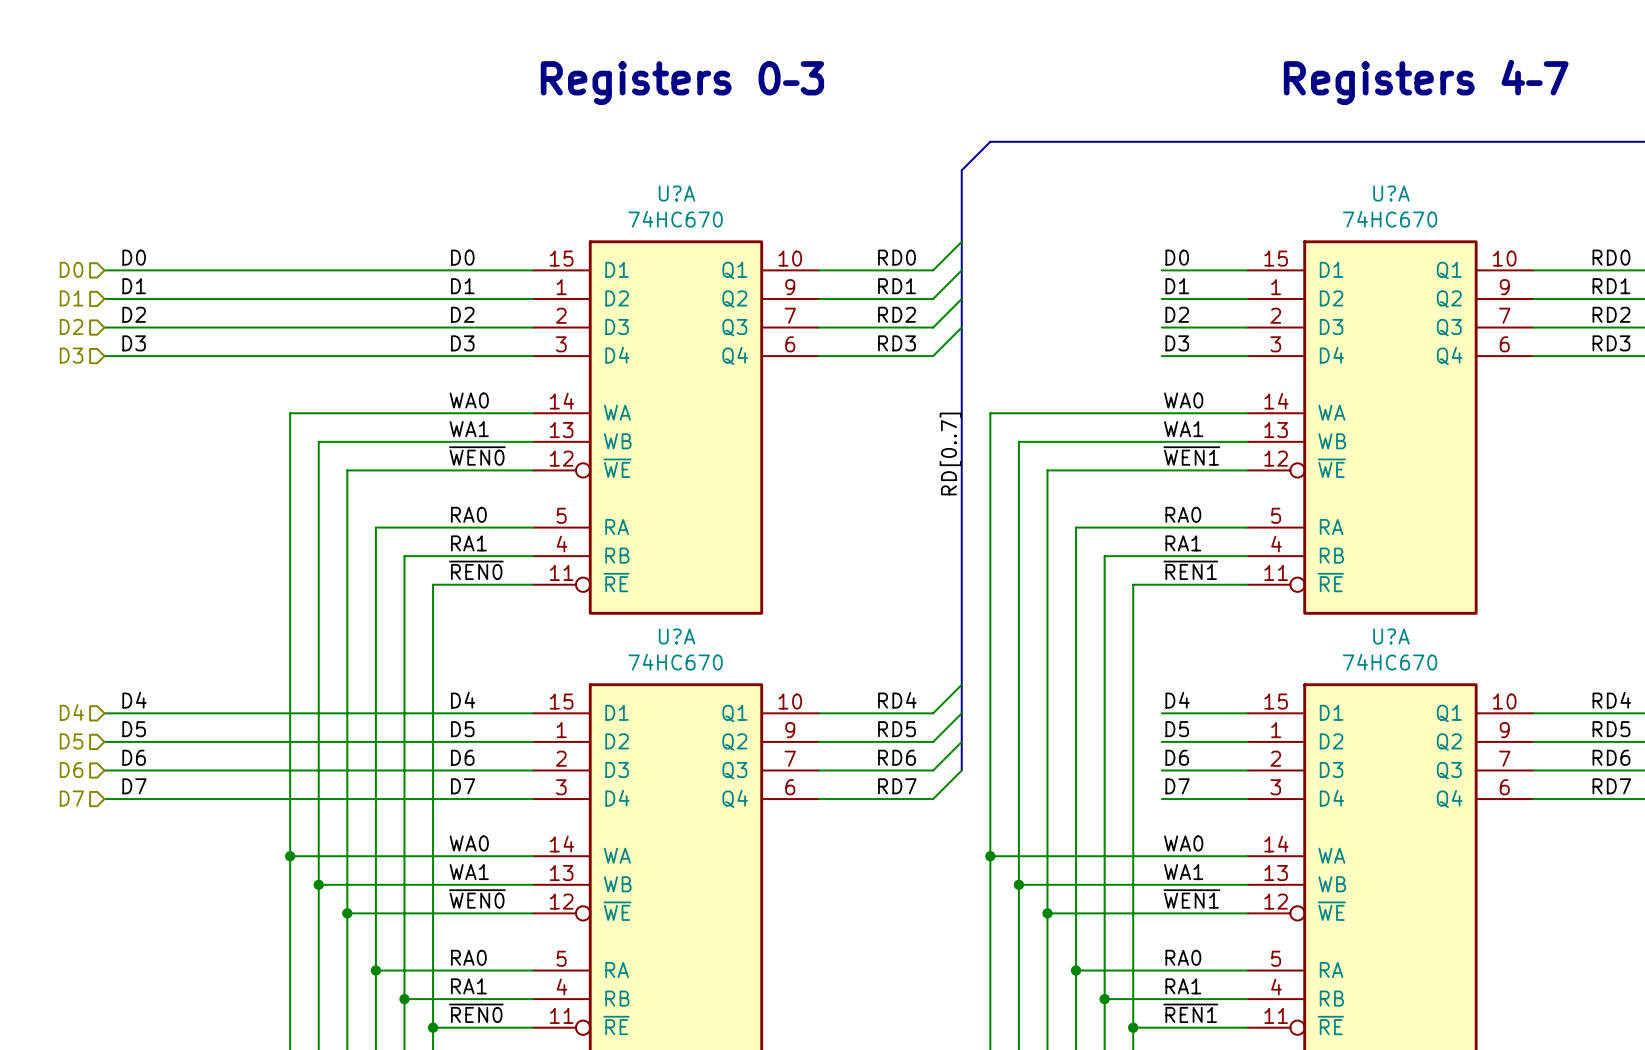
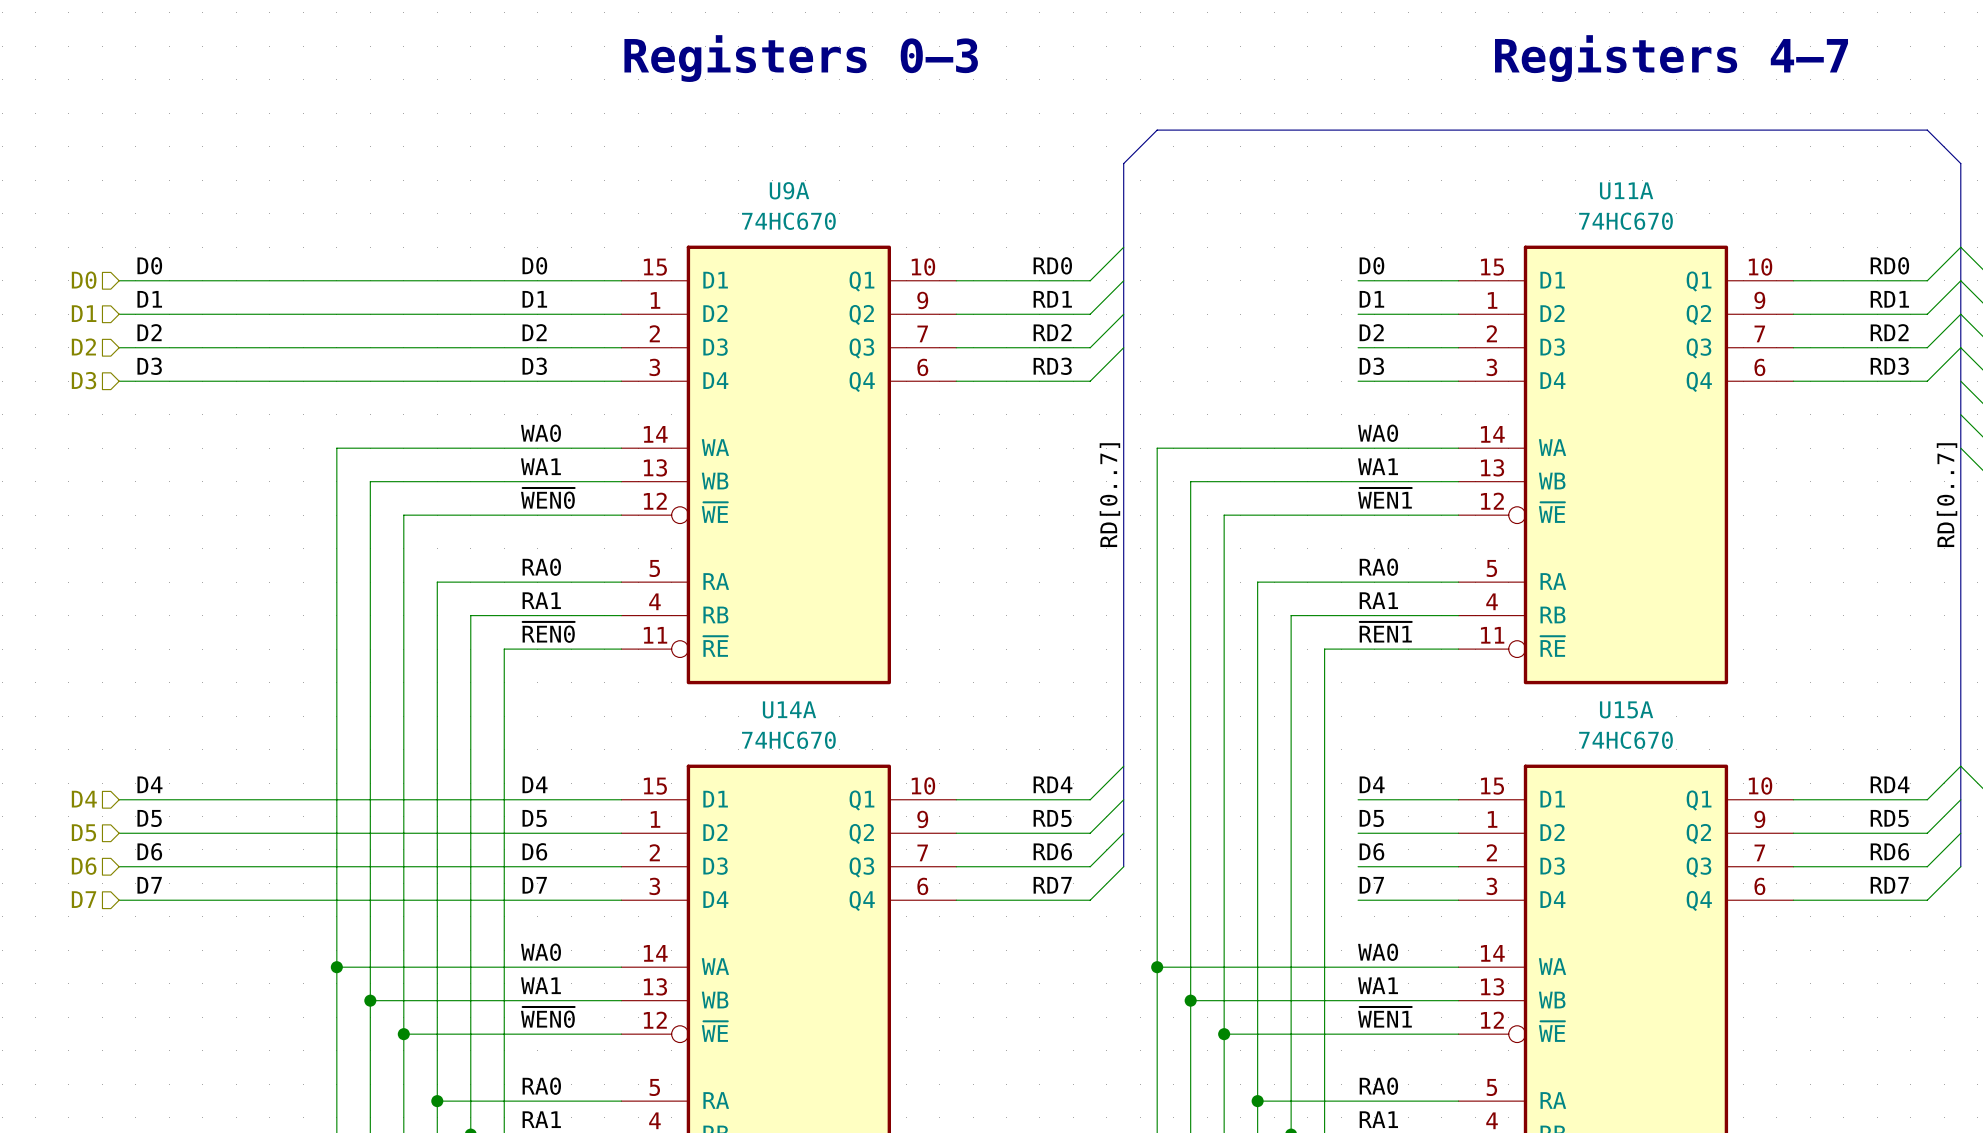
U?A name: U?A (676, 193) -> U9A (789, 190)
U?A name: U?A (1391, 193) -> U11A (1626, 190)
U?A name: U?A (676, 636) -> U14A (789, 709)
U?A name: U?A (1391, 636) -> U15A (1626, 709)

